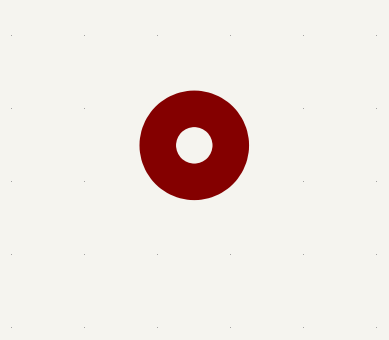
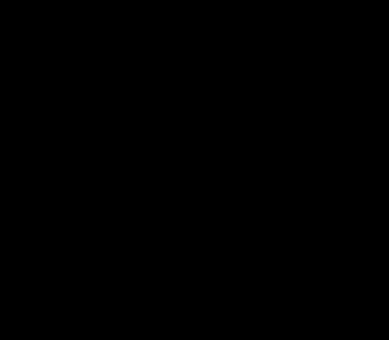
part: (194, 145) -> none

